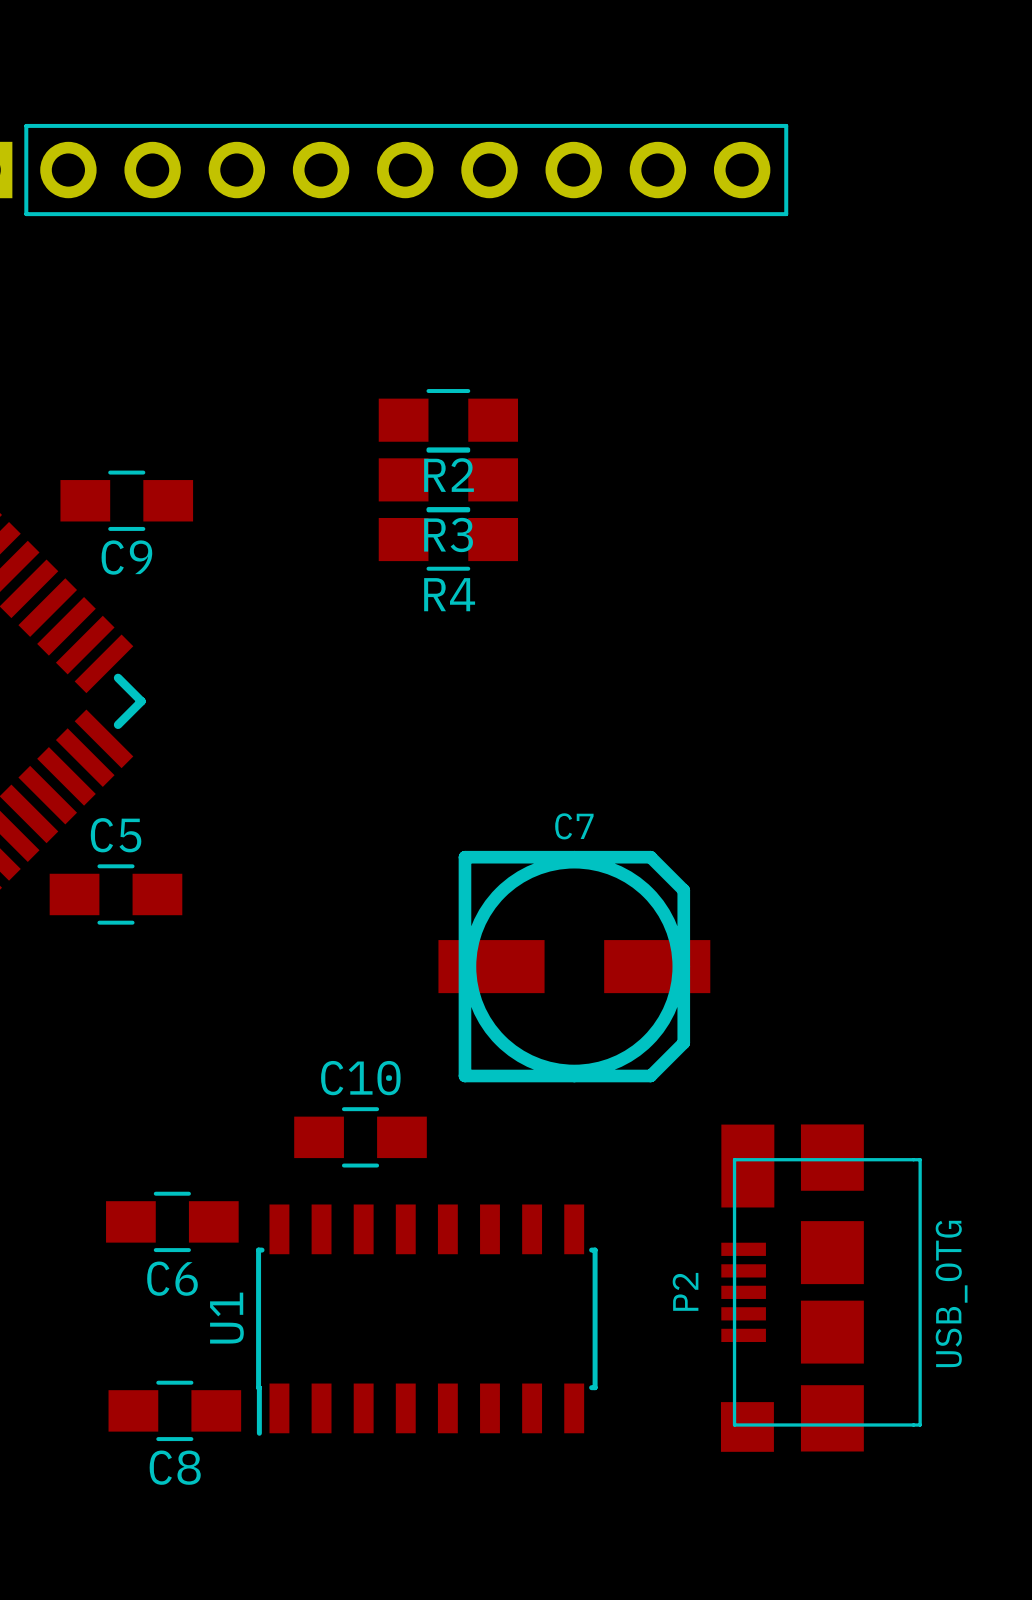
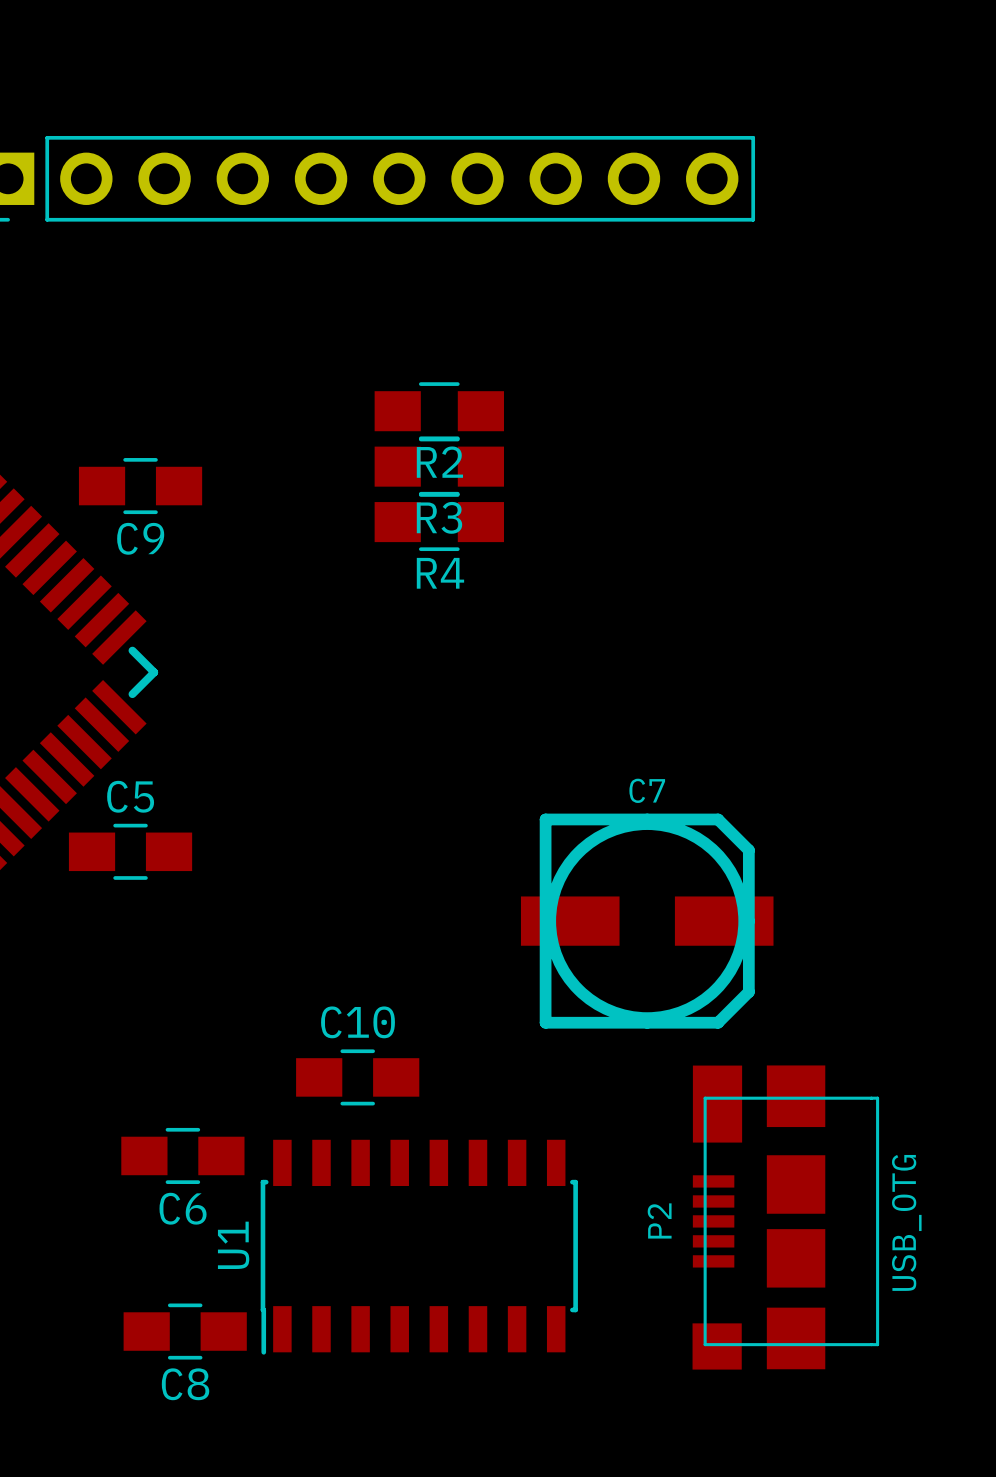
C7 position: (574, 966) -> (647, 921)

